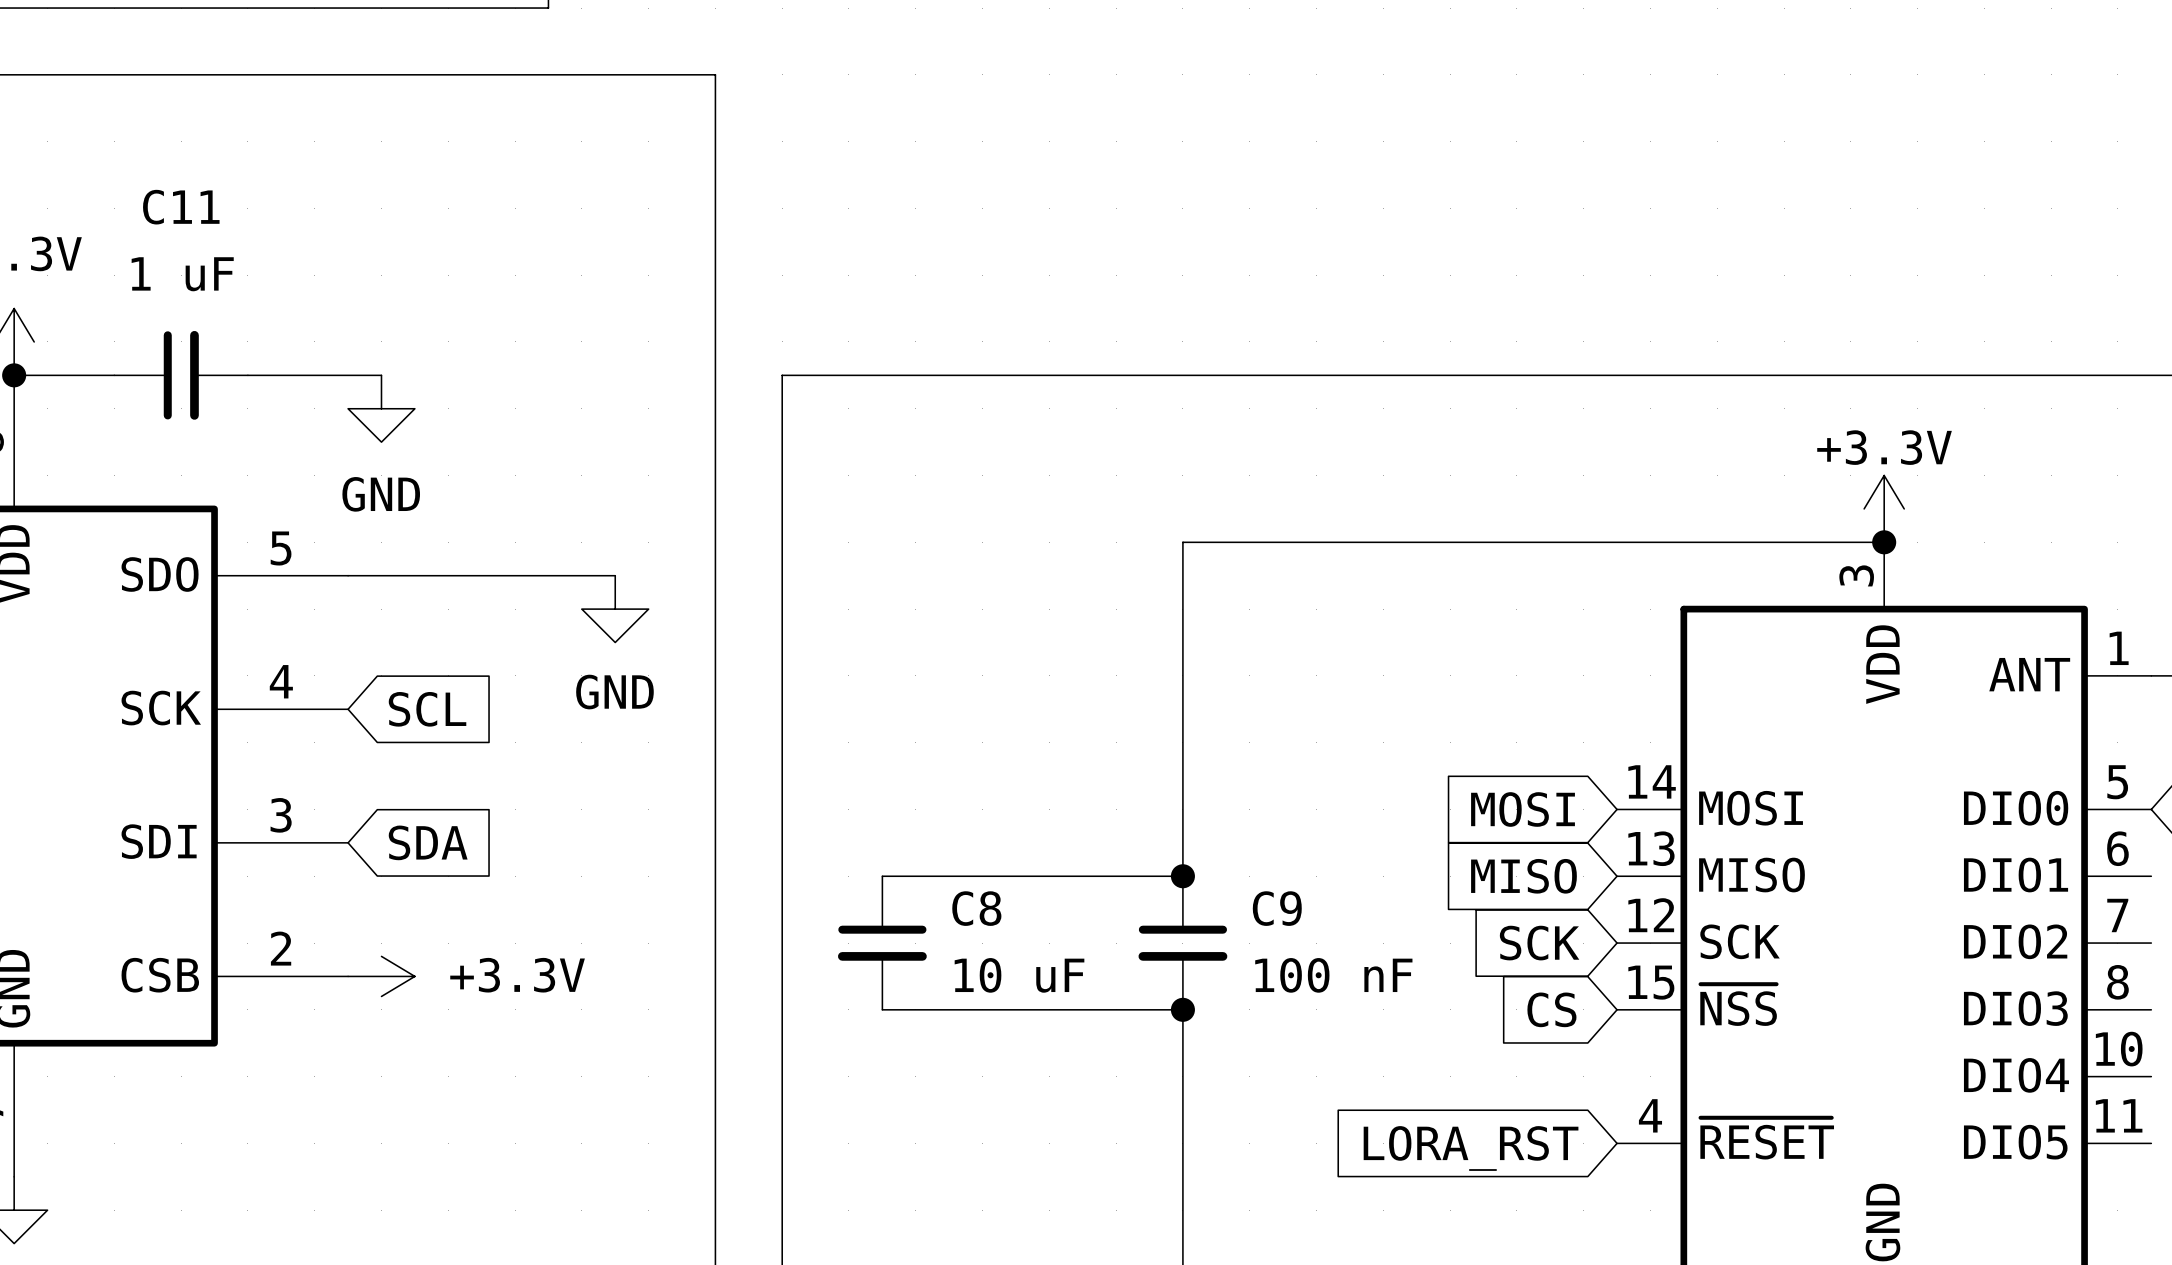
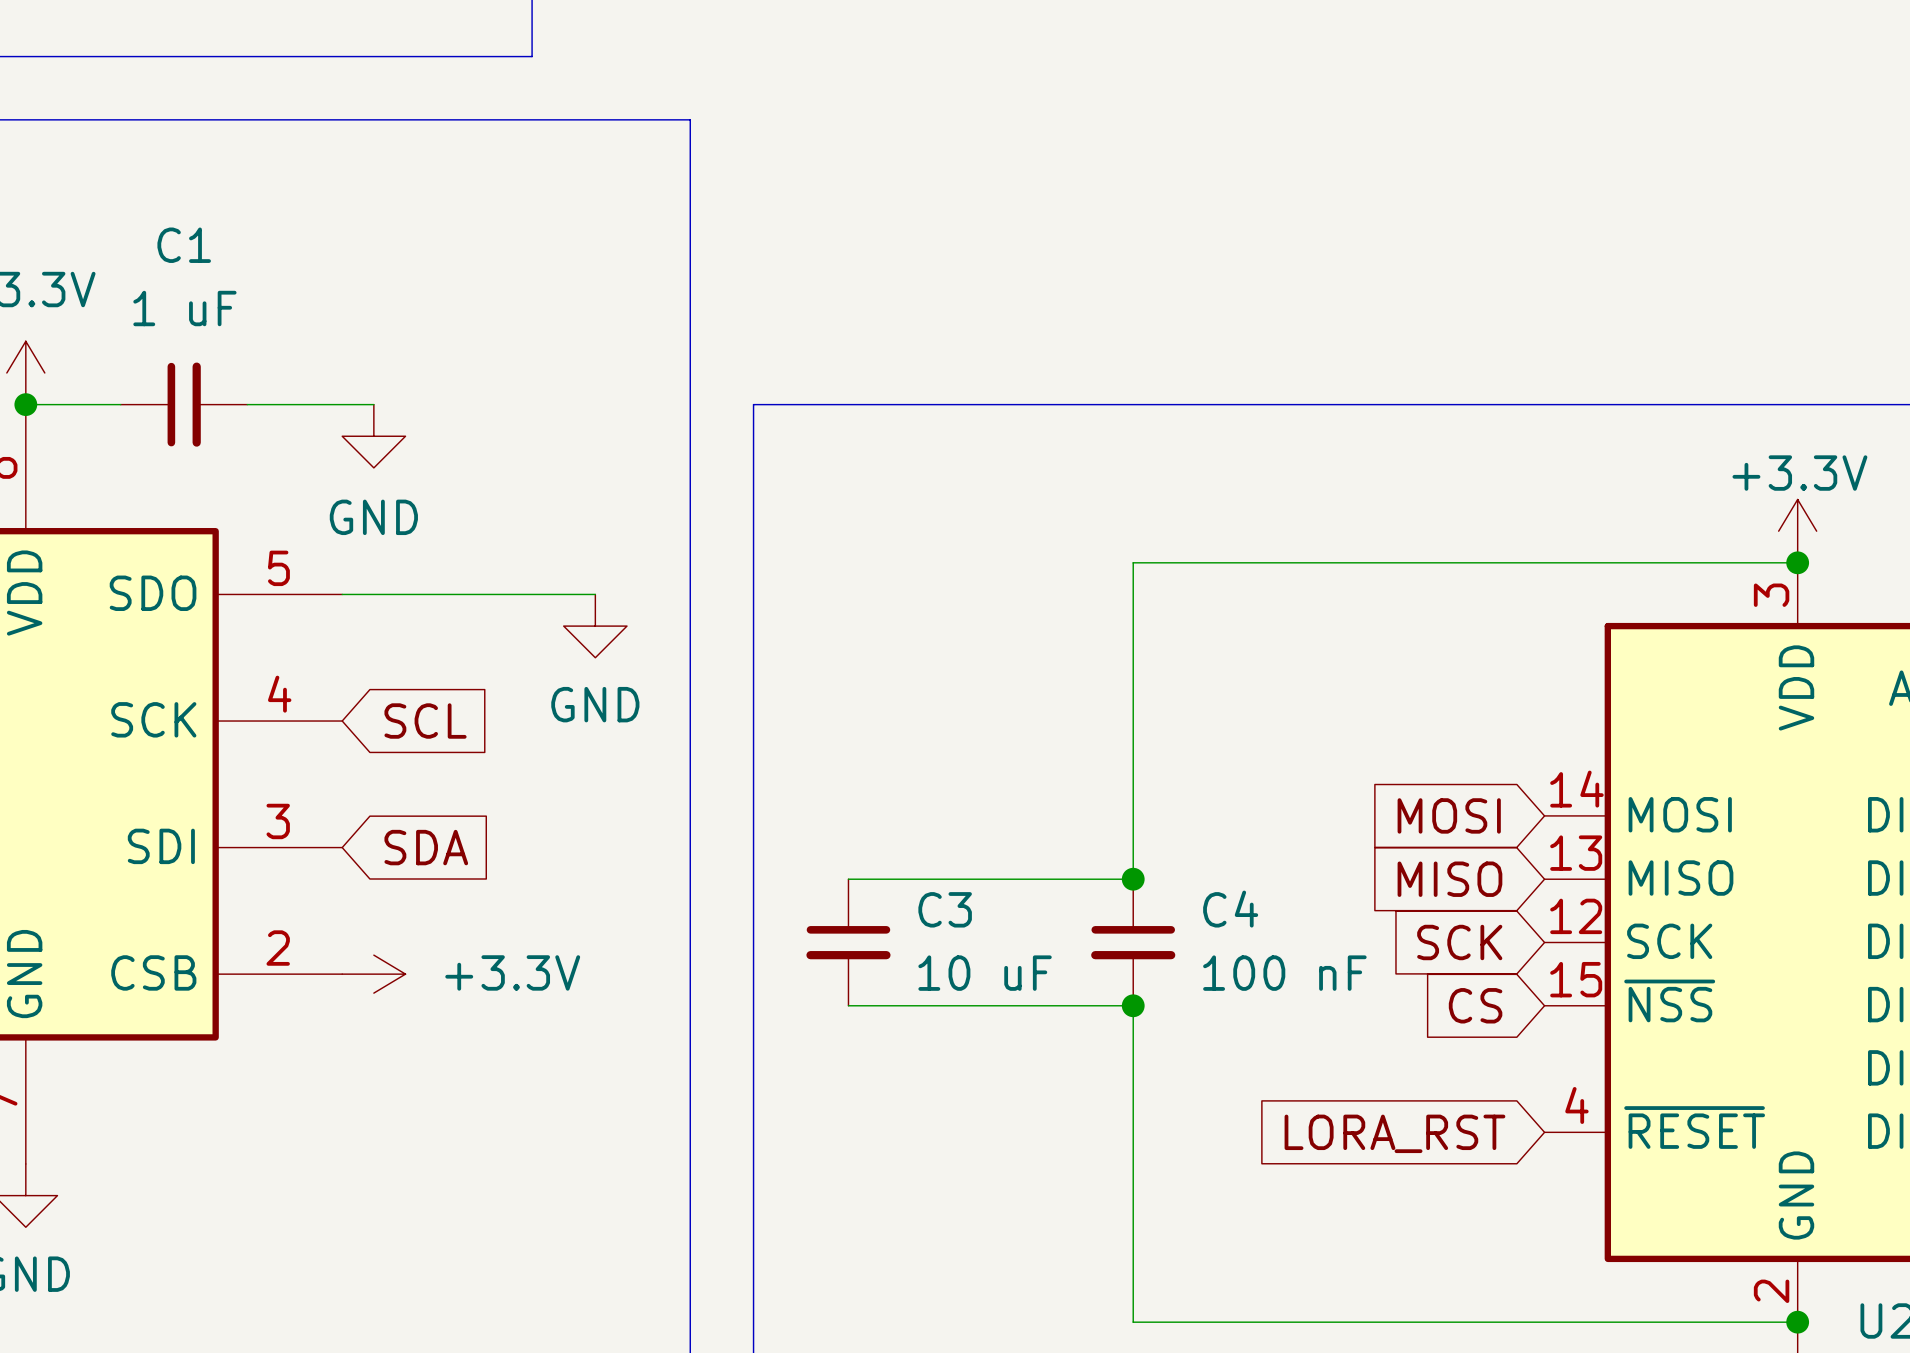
C11 name: C11 (181, 207) -> C1 (184, 245)
C8 name: C8 (976, 908) -> C3 (945, 909)
C9 name: C9 (1277, 908) -> C4 (1230, 909)

